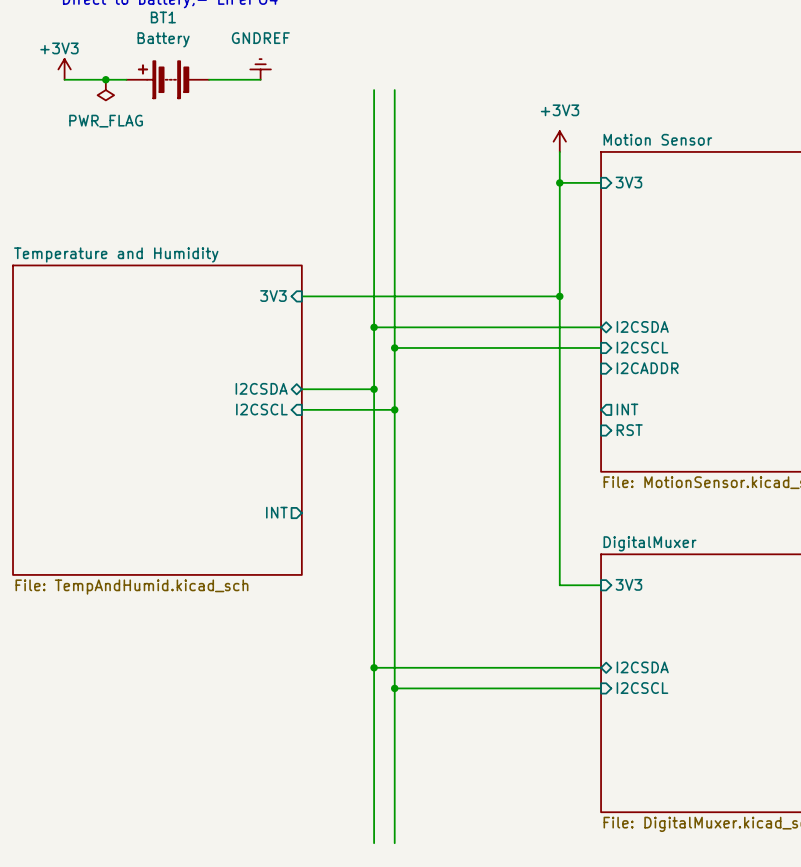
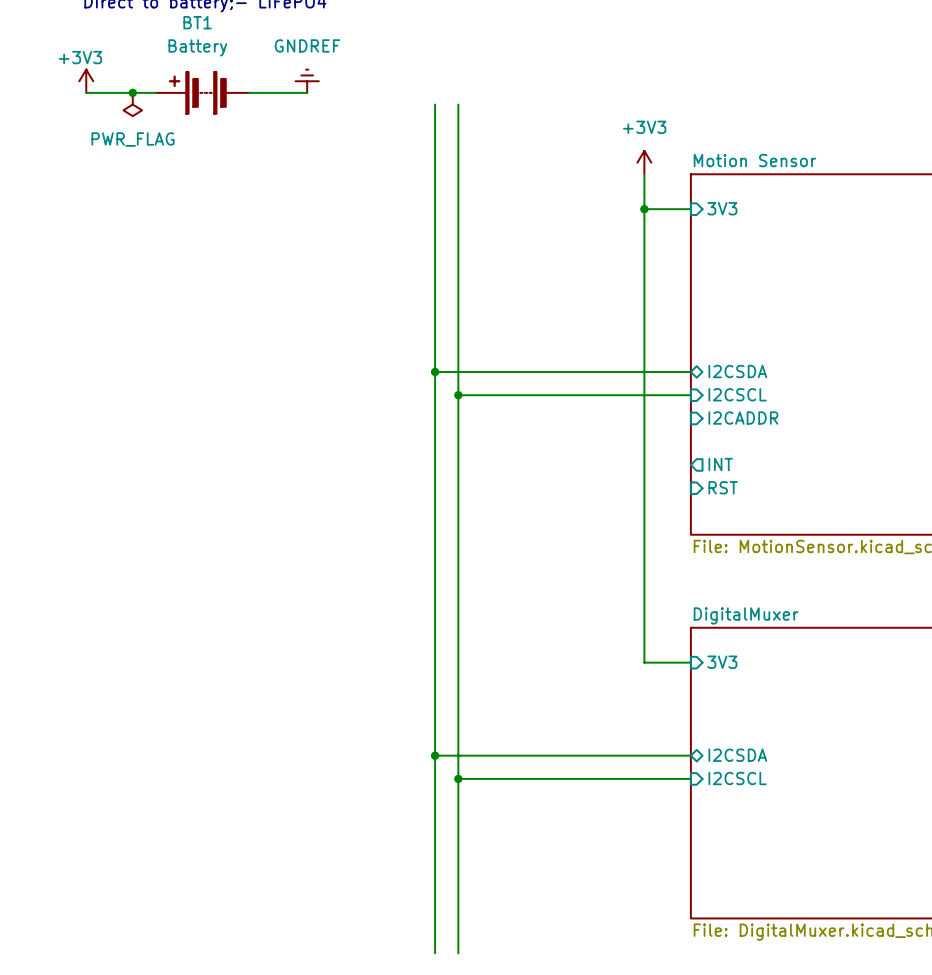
sheet pin: 3V3 (273, 296) -> none
wire: (301, 296) (559, 296) -> none
junction: (559, 296) -> none
sheet pin: I2CSDA (261, 388) -> none
wire: (301, 389) (374, 389) -> none
junction: (374, 389) -> none
sheet pin: I2CSCL (261, 409) -> none
wire: (301, 409) (394, 409) -> none
junction: (394, 409) -> none
sheet Temperature and Humidity: File: TempAndHumid.kicad_sch (157, 420) -> none
sheet pin: INT (276, 512) -> none

